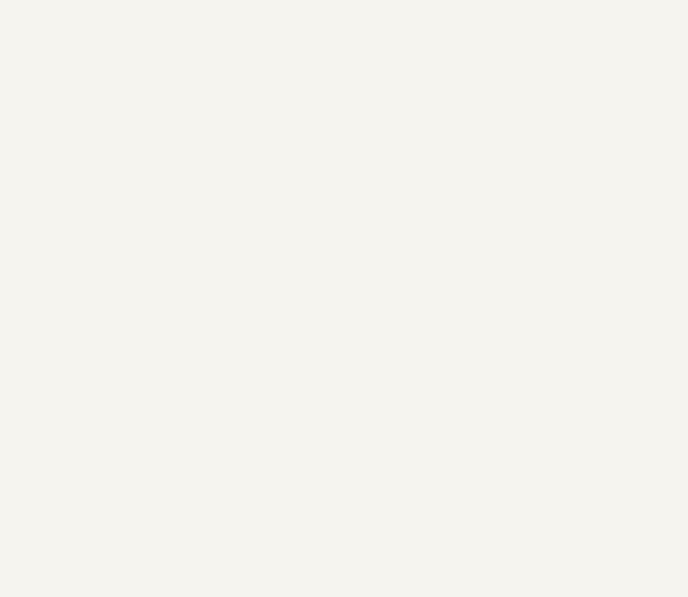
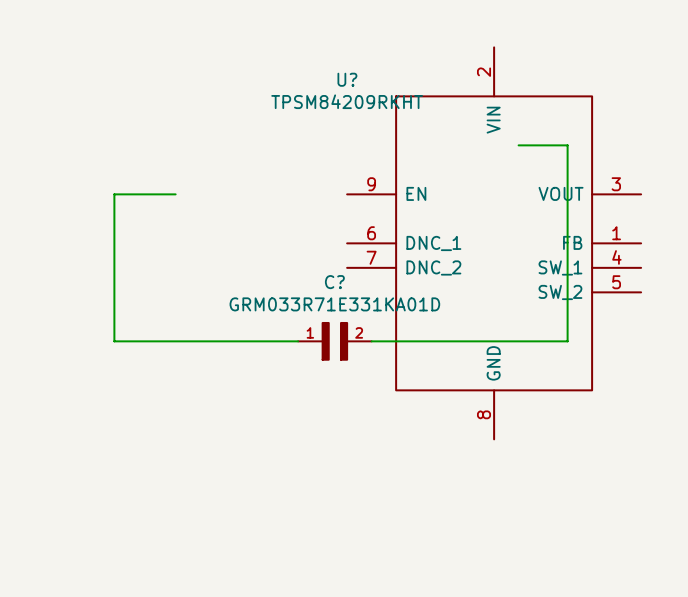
wire: none -> (518, 145) (567, 145) (567, 341) (371, 341)
wire: none -> (175, 194) (114, 194) (114, 341) (298, 341)
U?: none -> TPSM84209RKHT (494, 243)
C?: none -> GRM033R71E331KA01D (334, 341)

